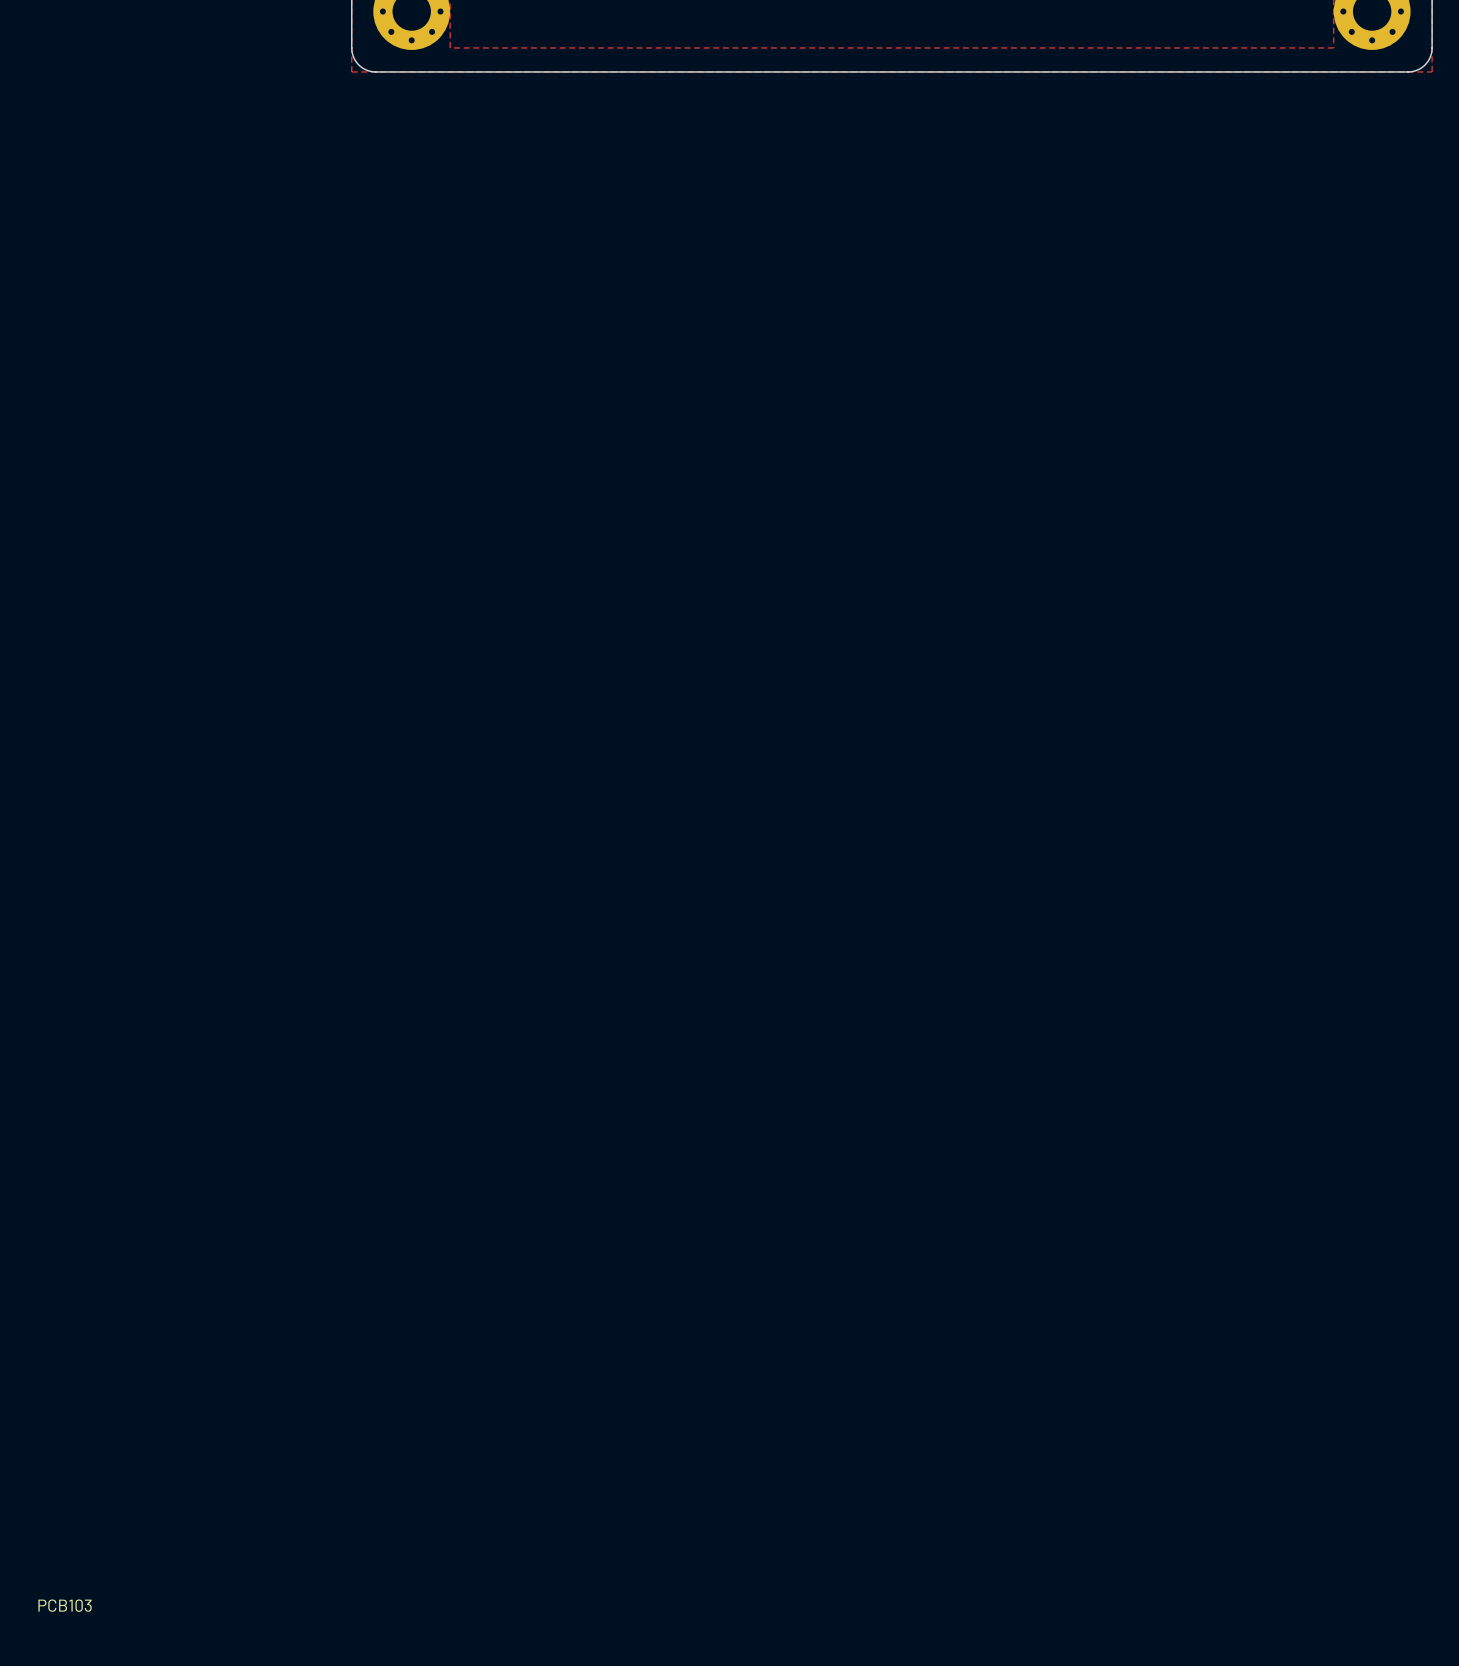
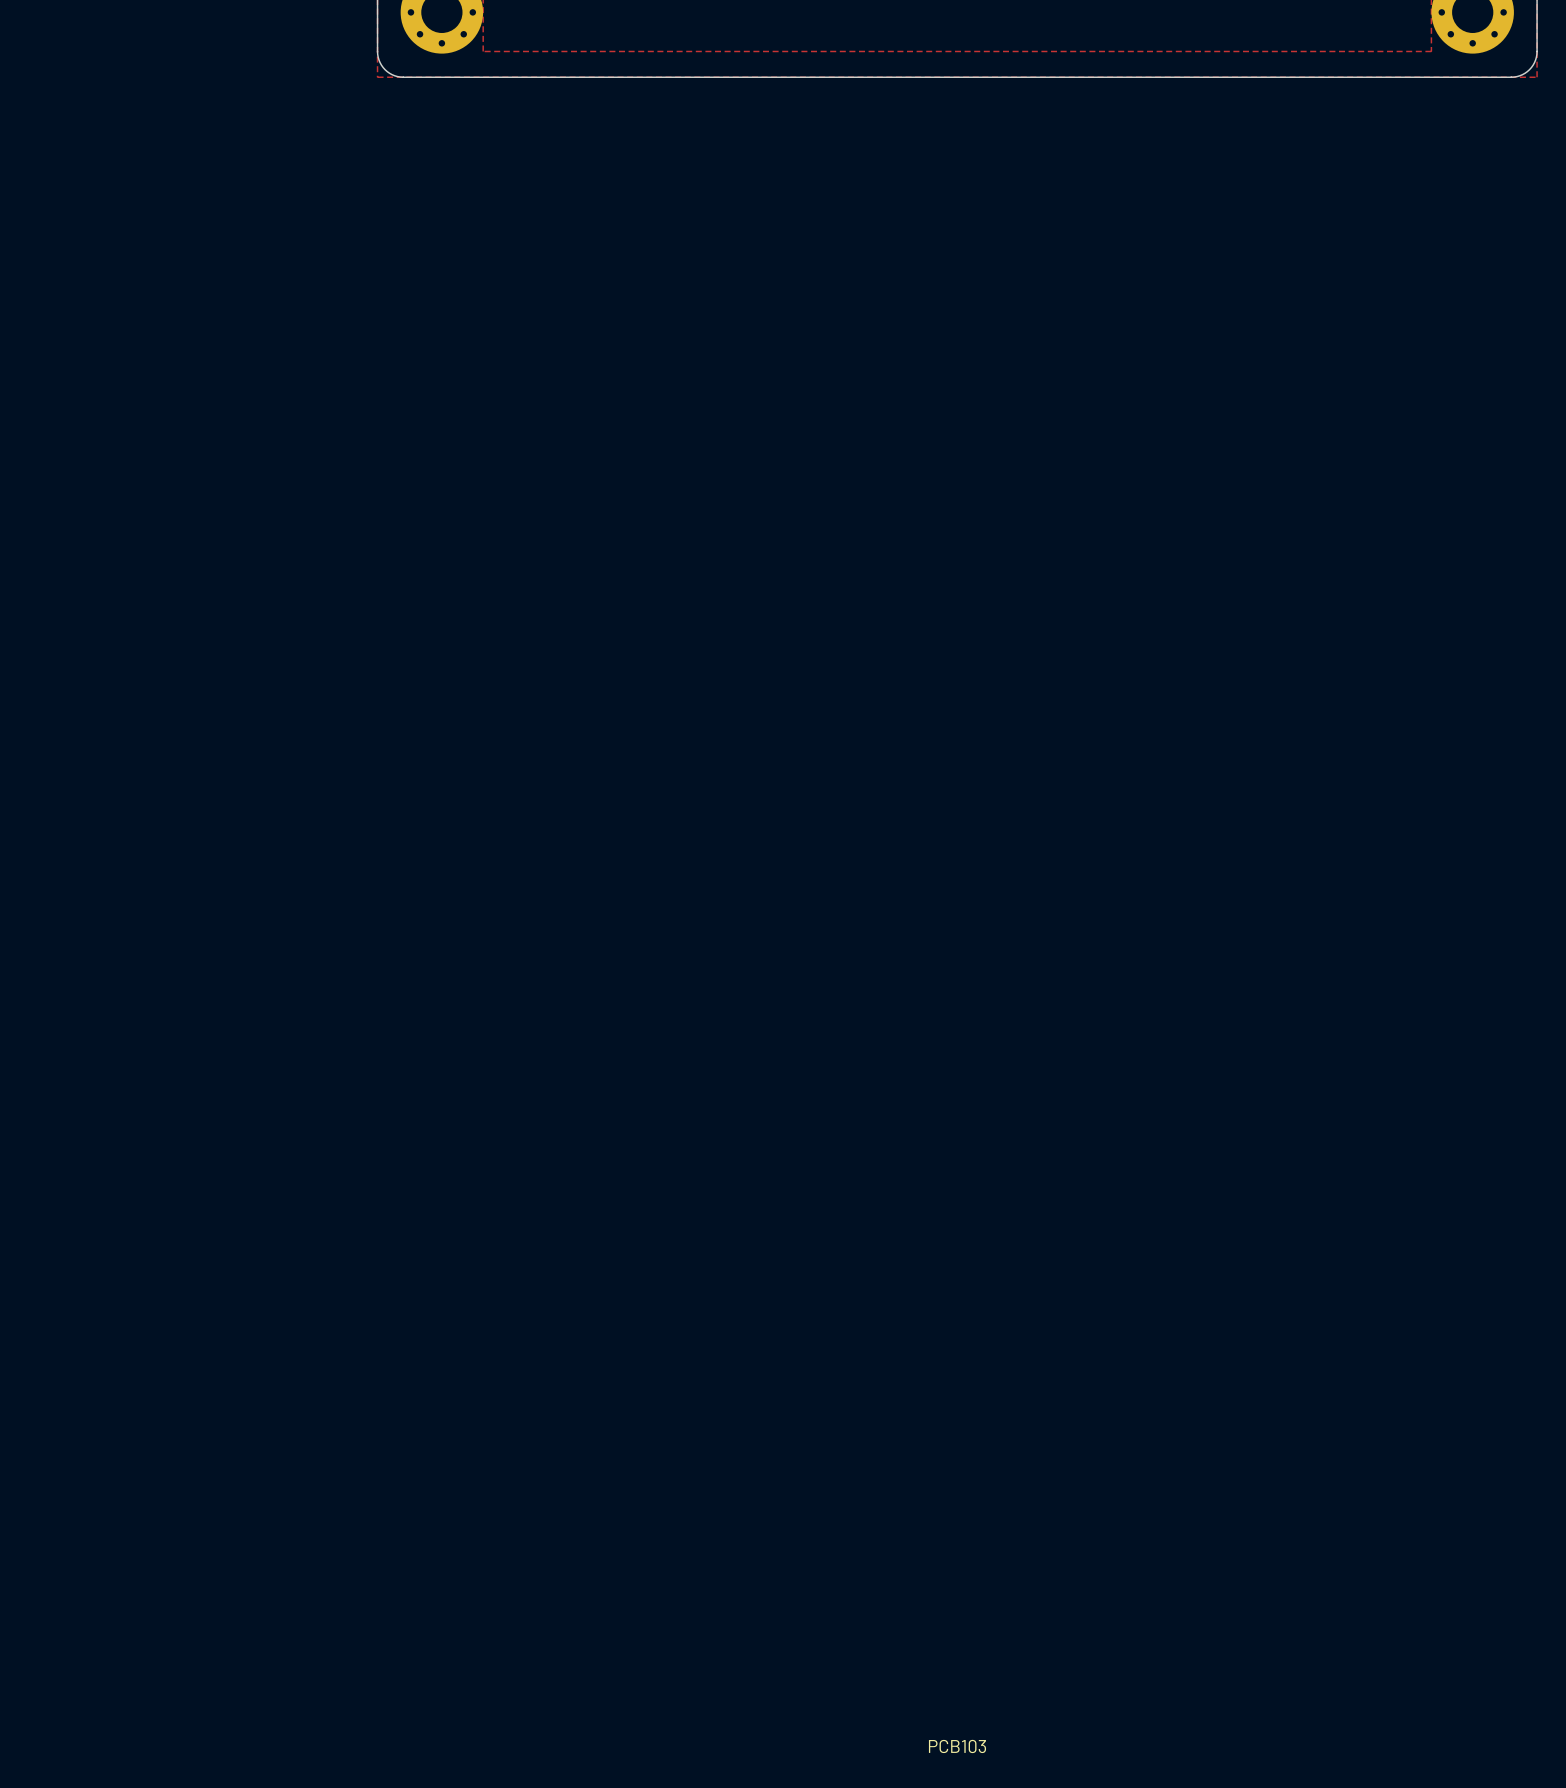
PCB103 position: (65, 1605) -> (957, 1746)

